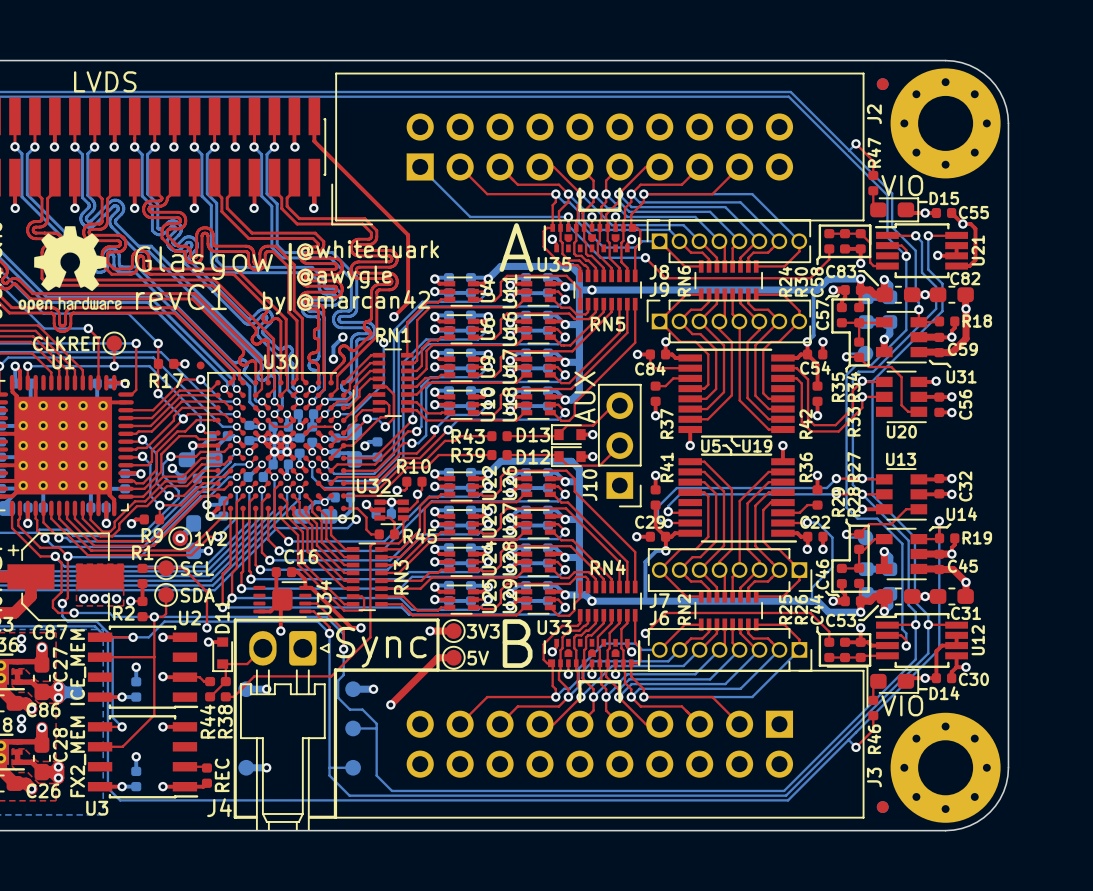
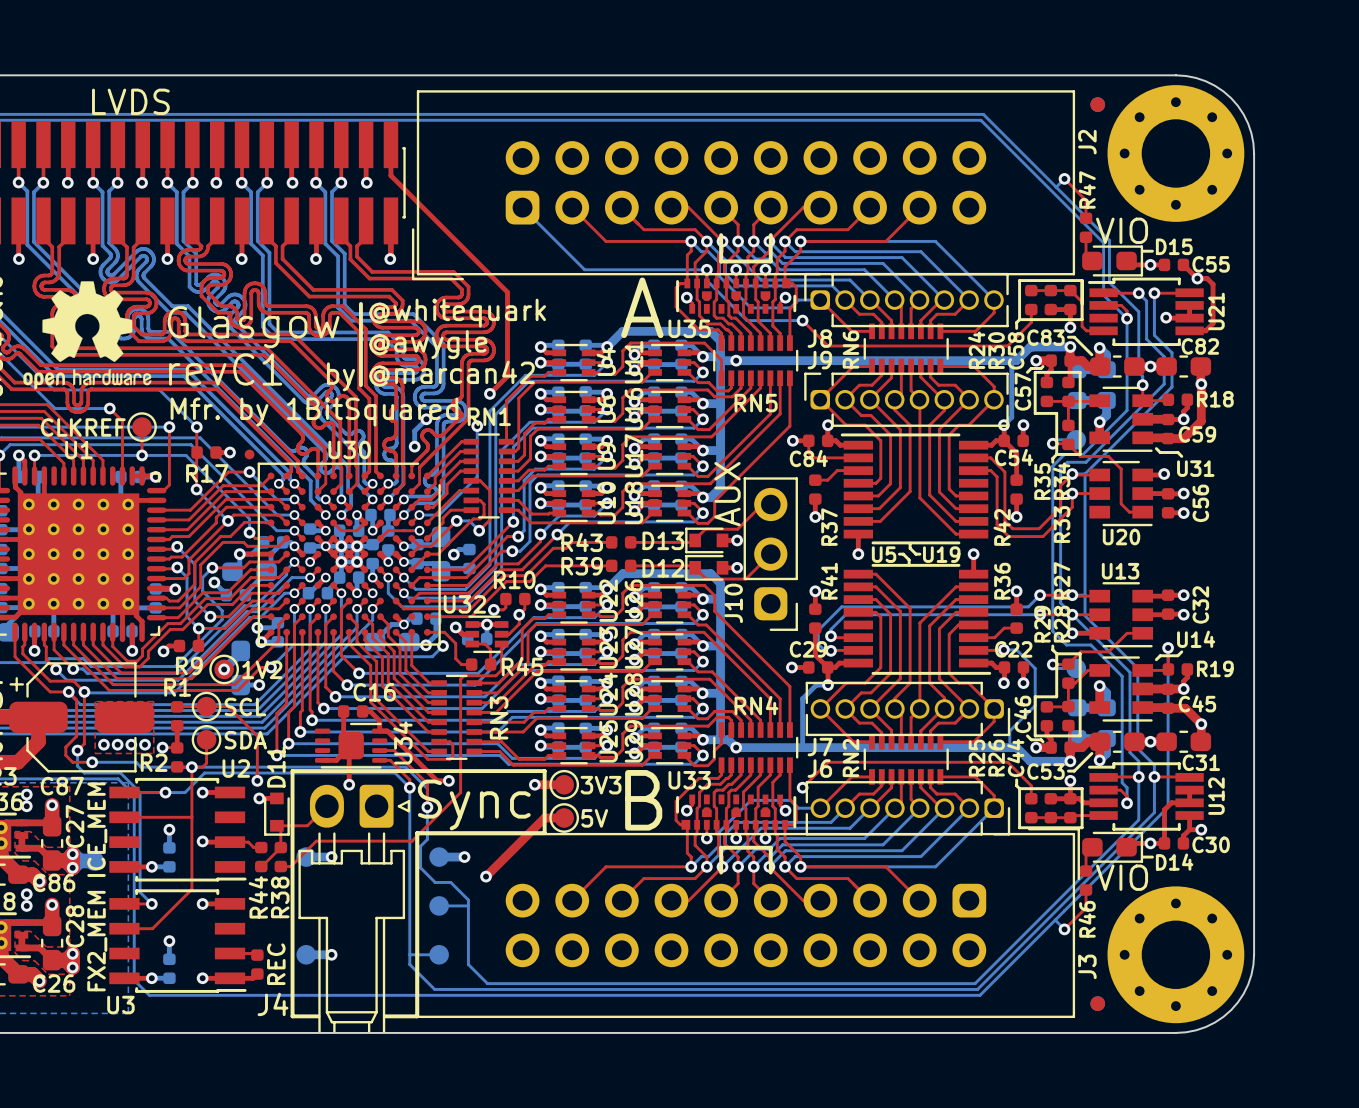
J2 footprint: [331, 72, 865, 226] -> [411, 90, 1076, 281]
J8 footprint: [646, 219, 812, 264] -> [804, 272, 1009, 328]
J9 footprint: [646, 299, 812, 344] -> [804, 372, 1009, 427]
text: none -> Mfr. by 1BitSquared (314, 412)
J10 footprint: [597, 383, 642, 508] -> [743, 477, 798, 631]
C87 footprint: [7, 532, 124, 622] -> [9, 662, 154, 773]
J7 footprint: [647, 548, 813, 592] -> [805, 681, 1011, 737]
J6 footprint: [647, 628, 813, 672] -> [805, 781, 1011, 836]
J3 footprint: [335, 665, 869, 819] -> [416, 828, 1080, 1019]

